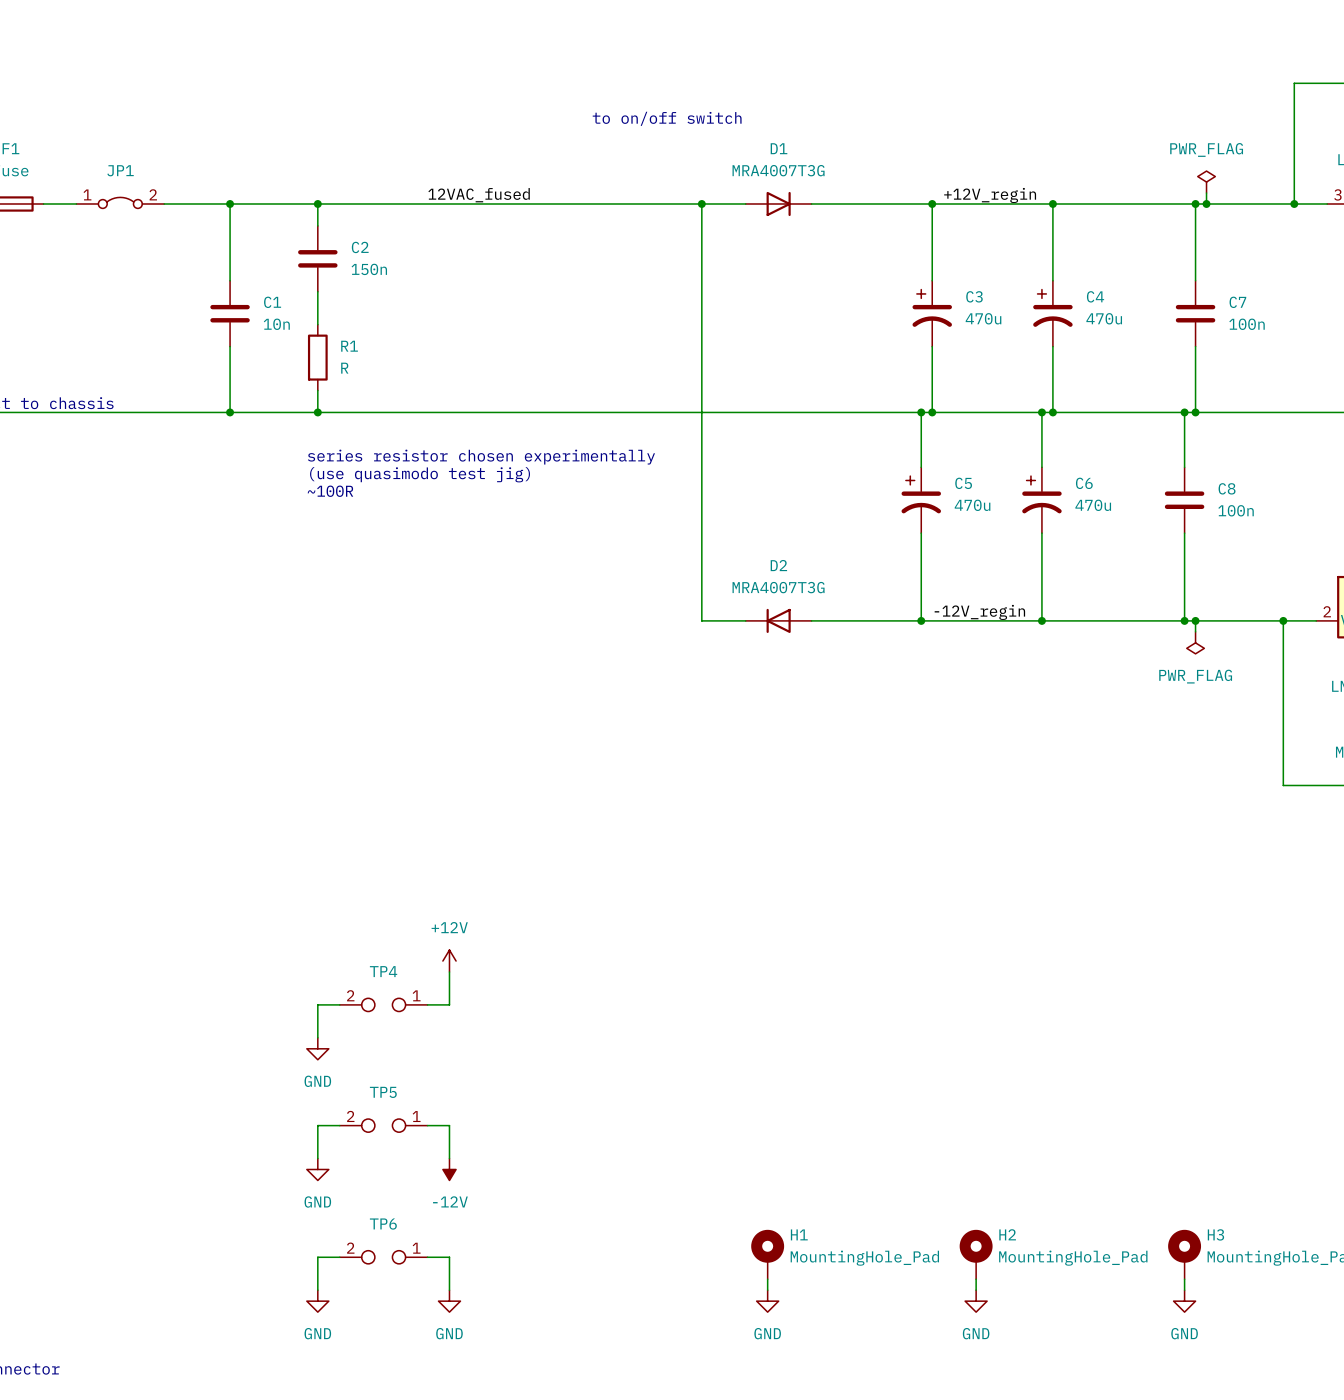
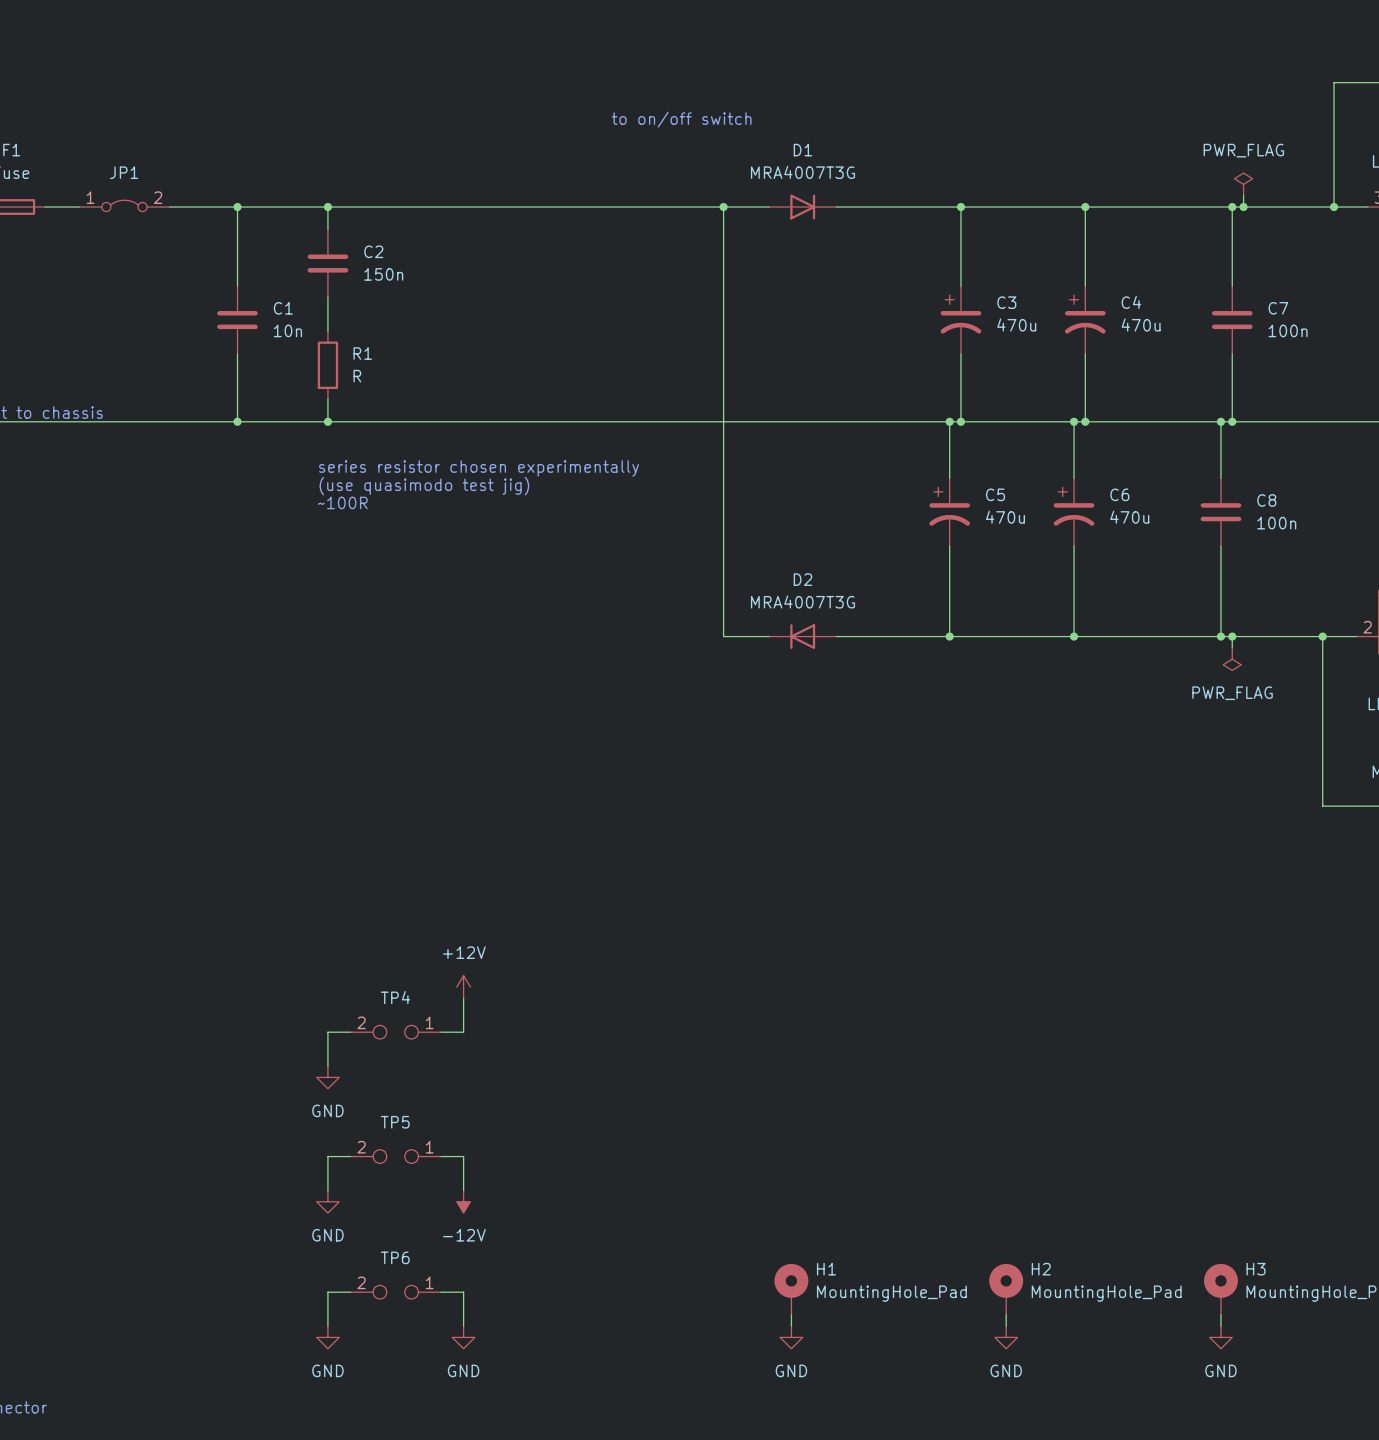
label: 12VAC_fused (479, 195) -> none
label: +12V_regin (990, 195) -> none
label: -12V_regin (979, 612) -> none

